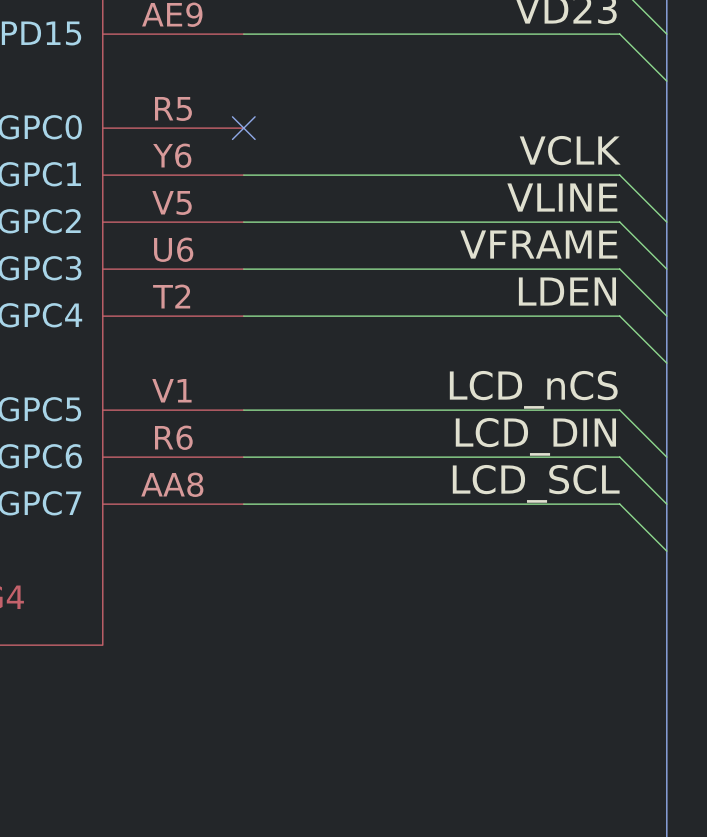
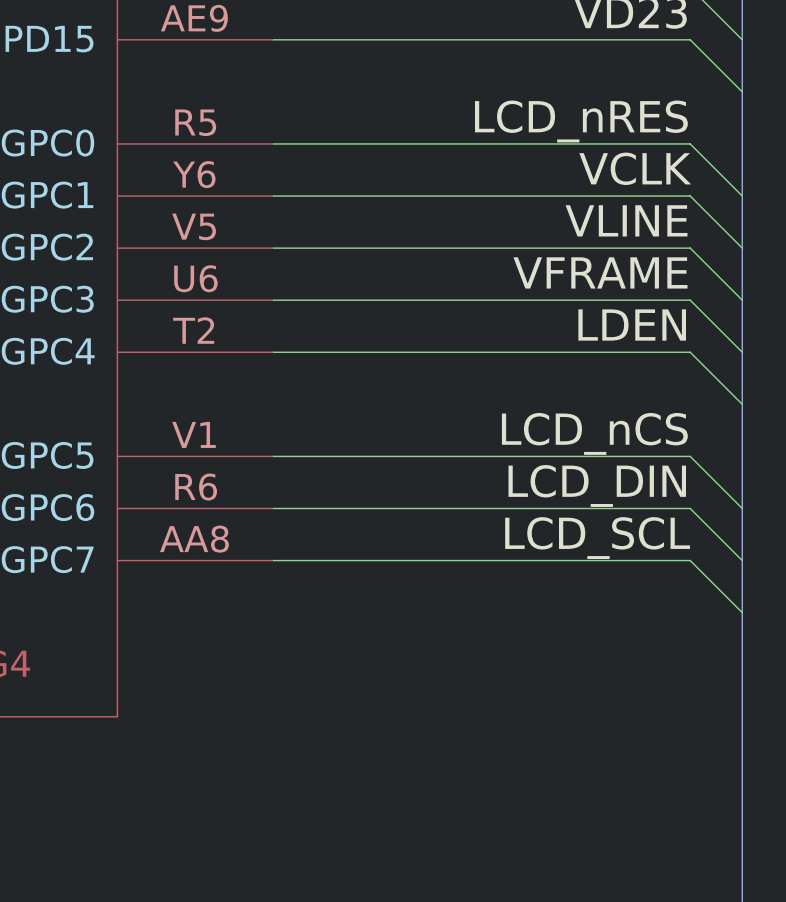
label: none -> LCD_nRES (581, 121)
wire: none -> (273, 143) (690, 143) (742, 196)
no-connect mark: (243, 128) -> none

